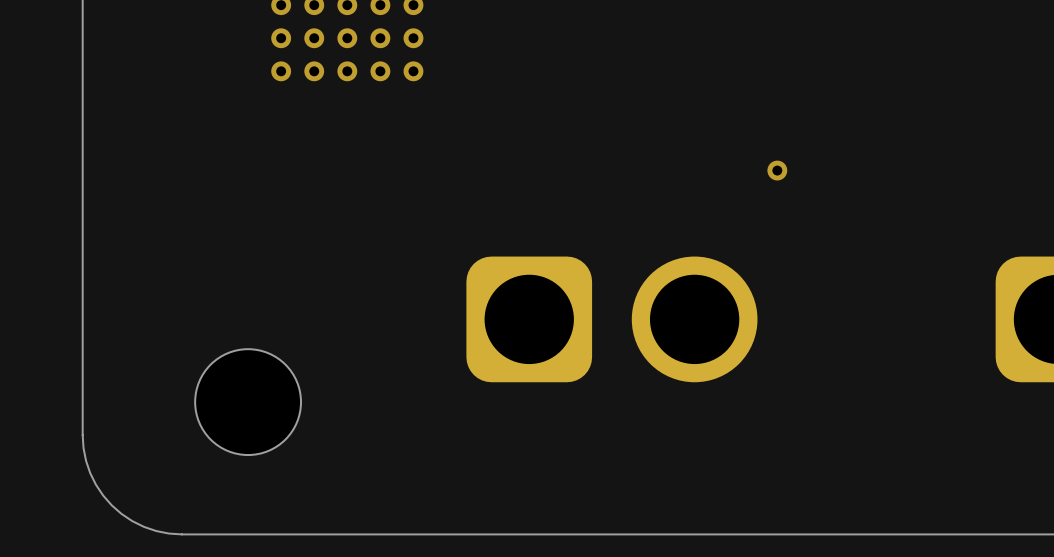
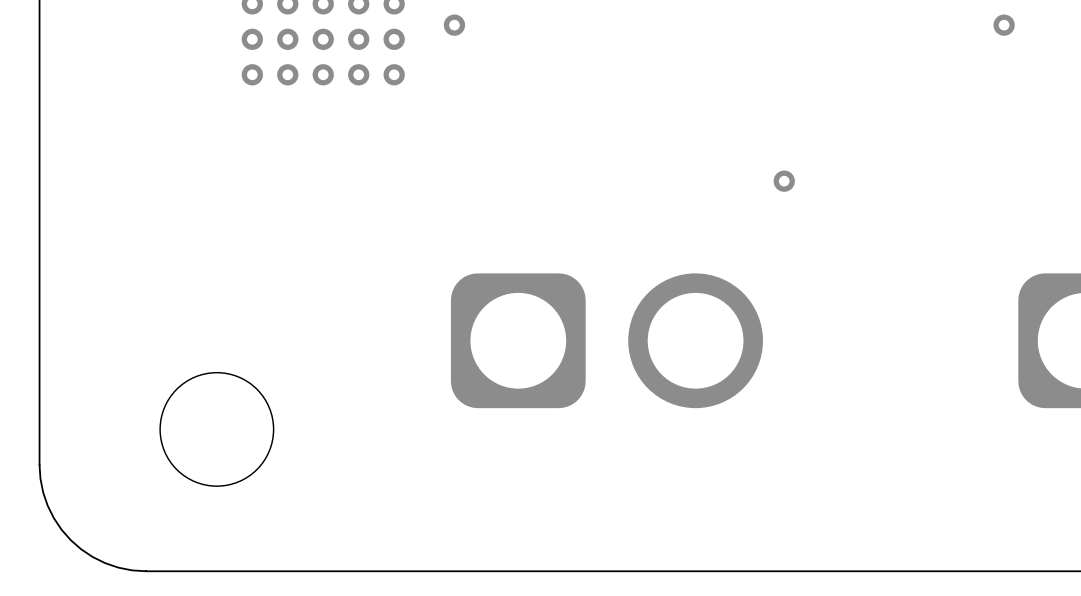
via: none -> (454, 25)
via: none -> (1004, 25)

